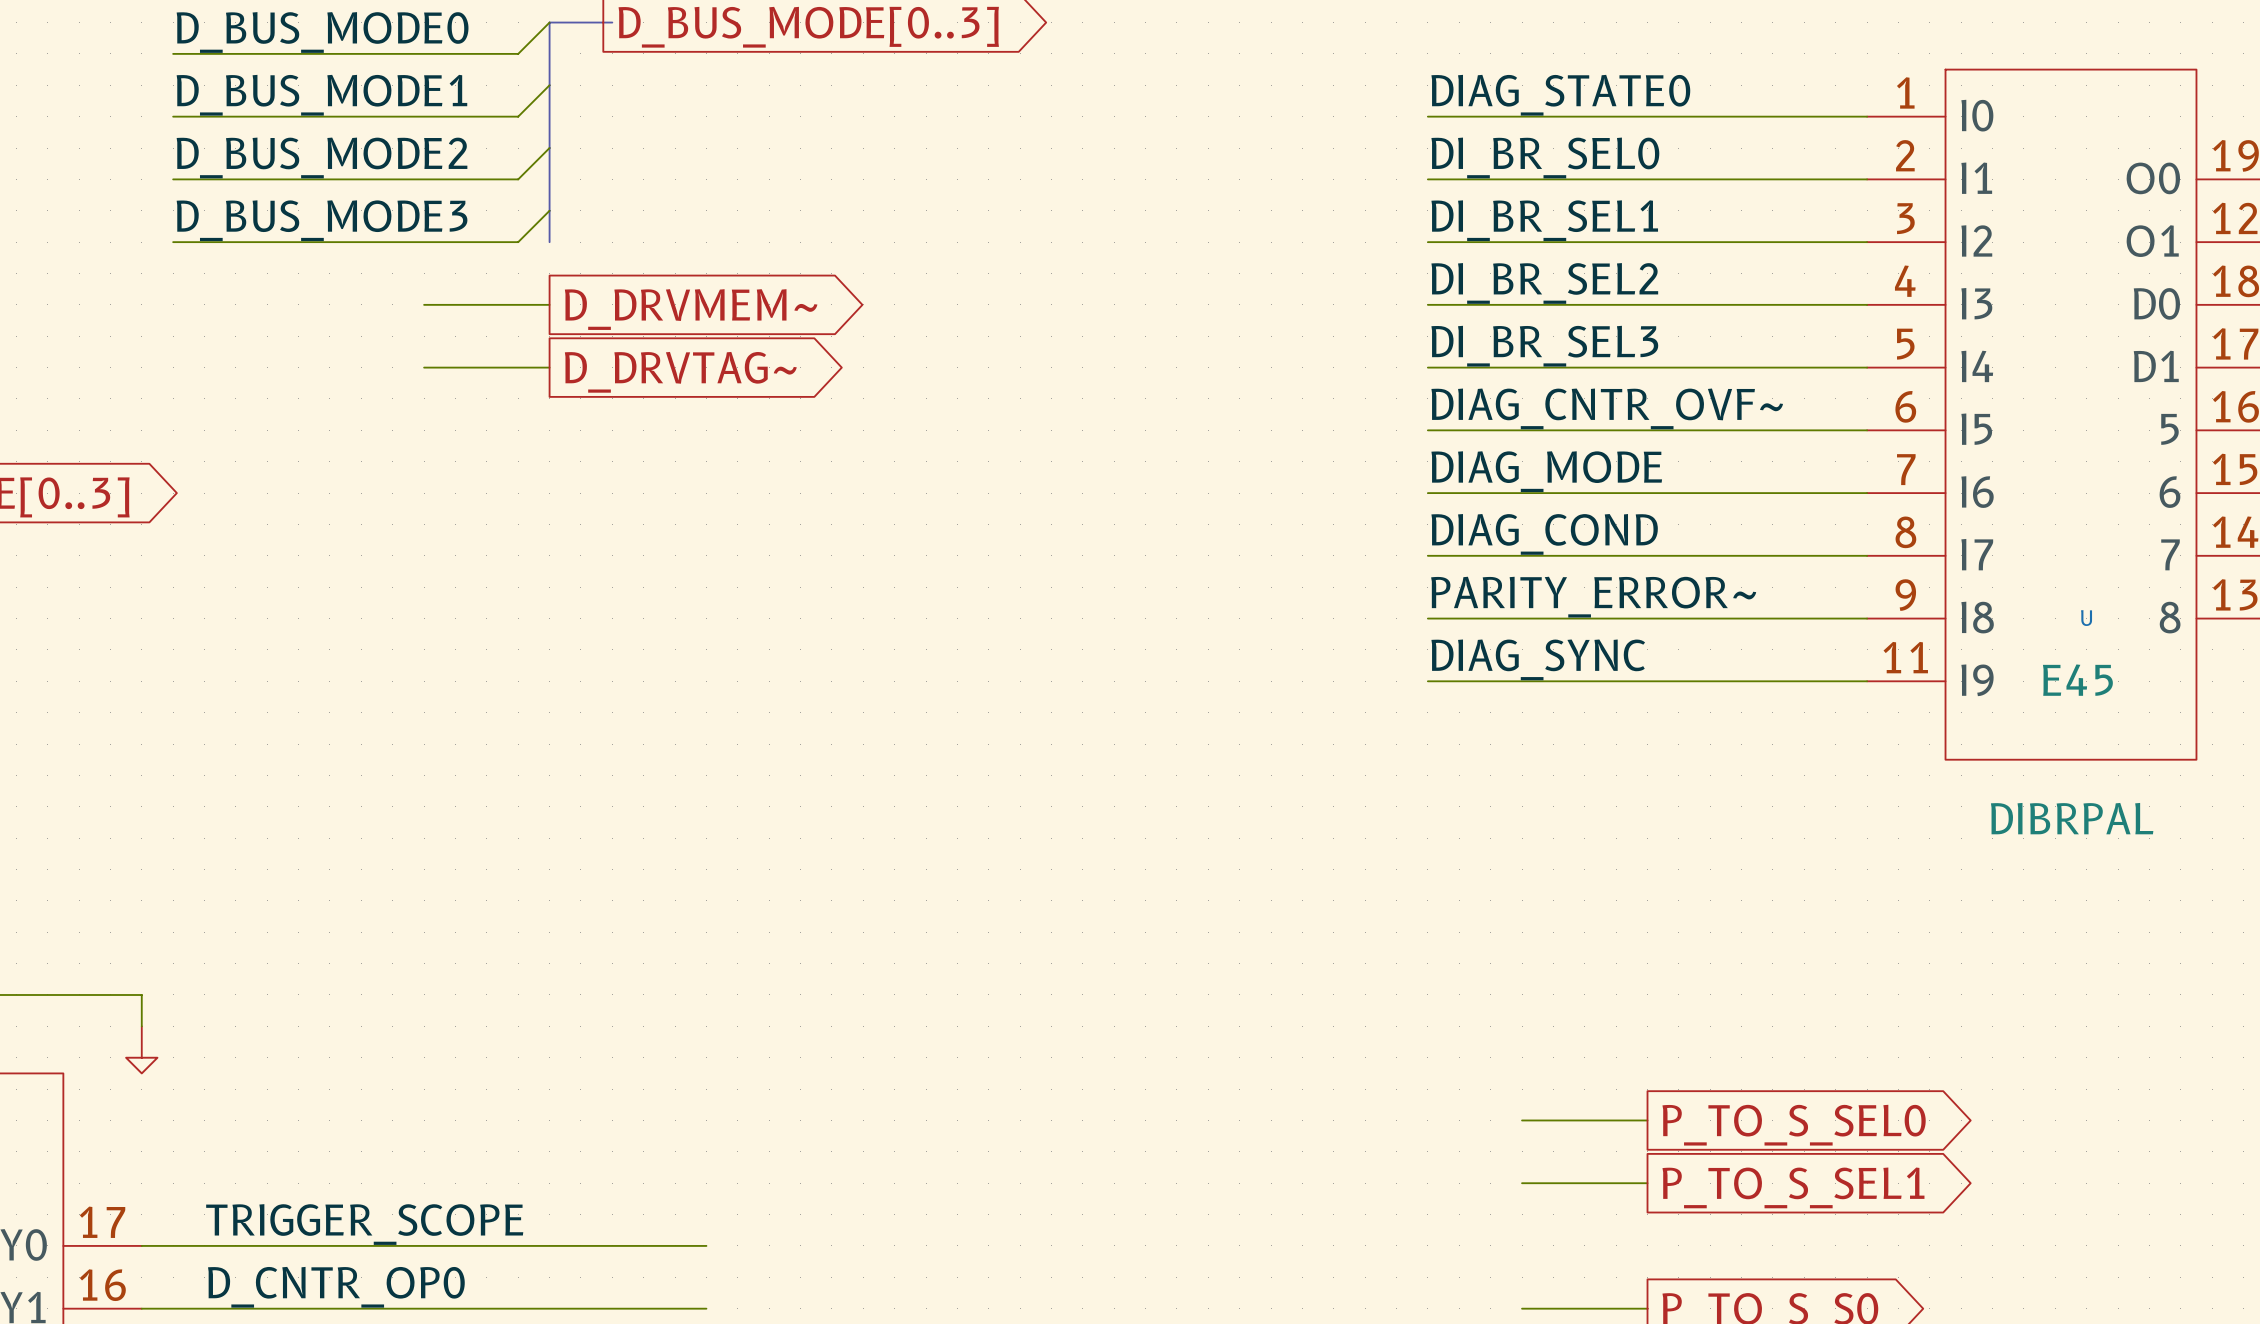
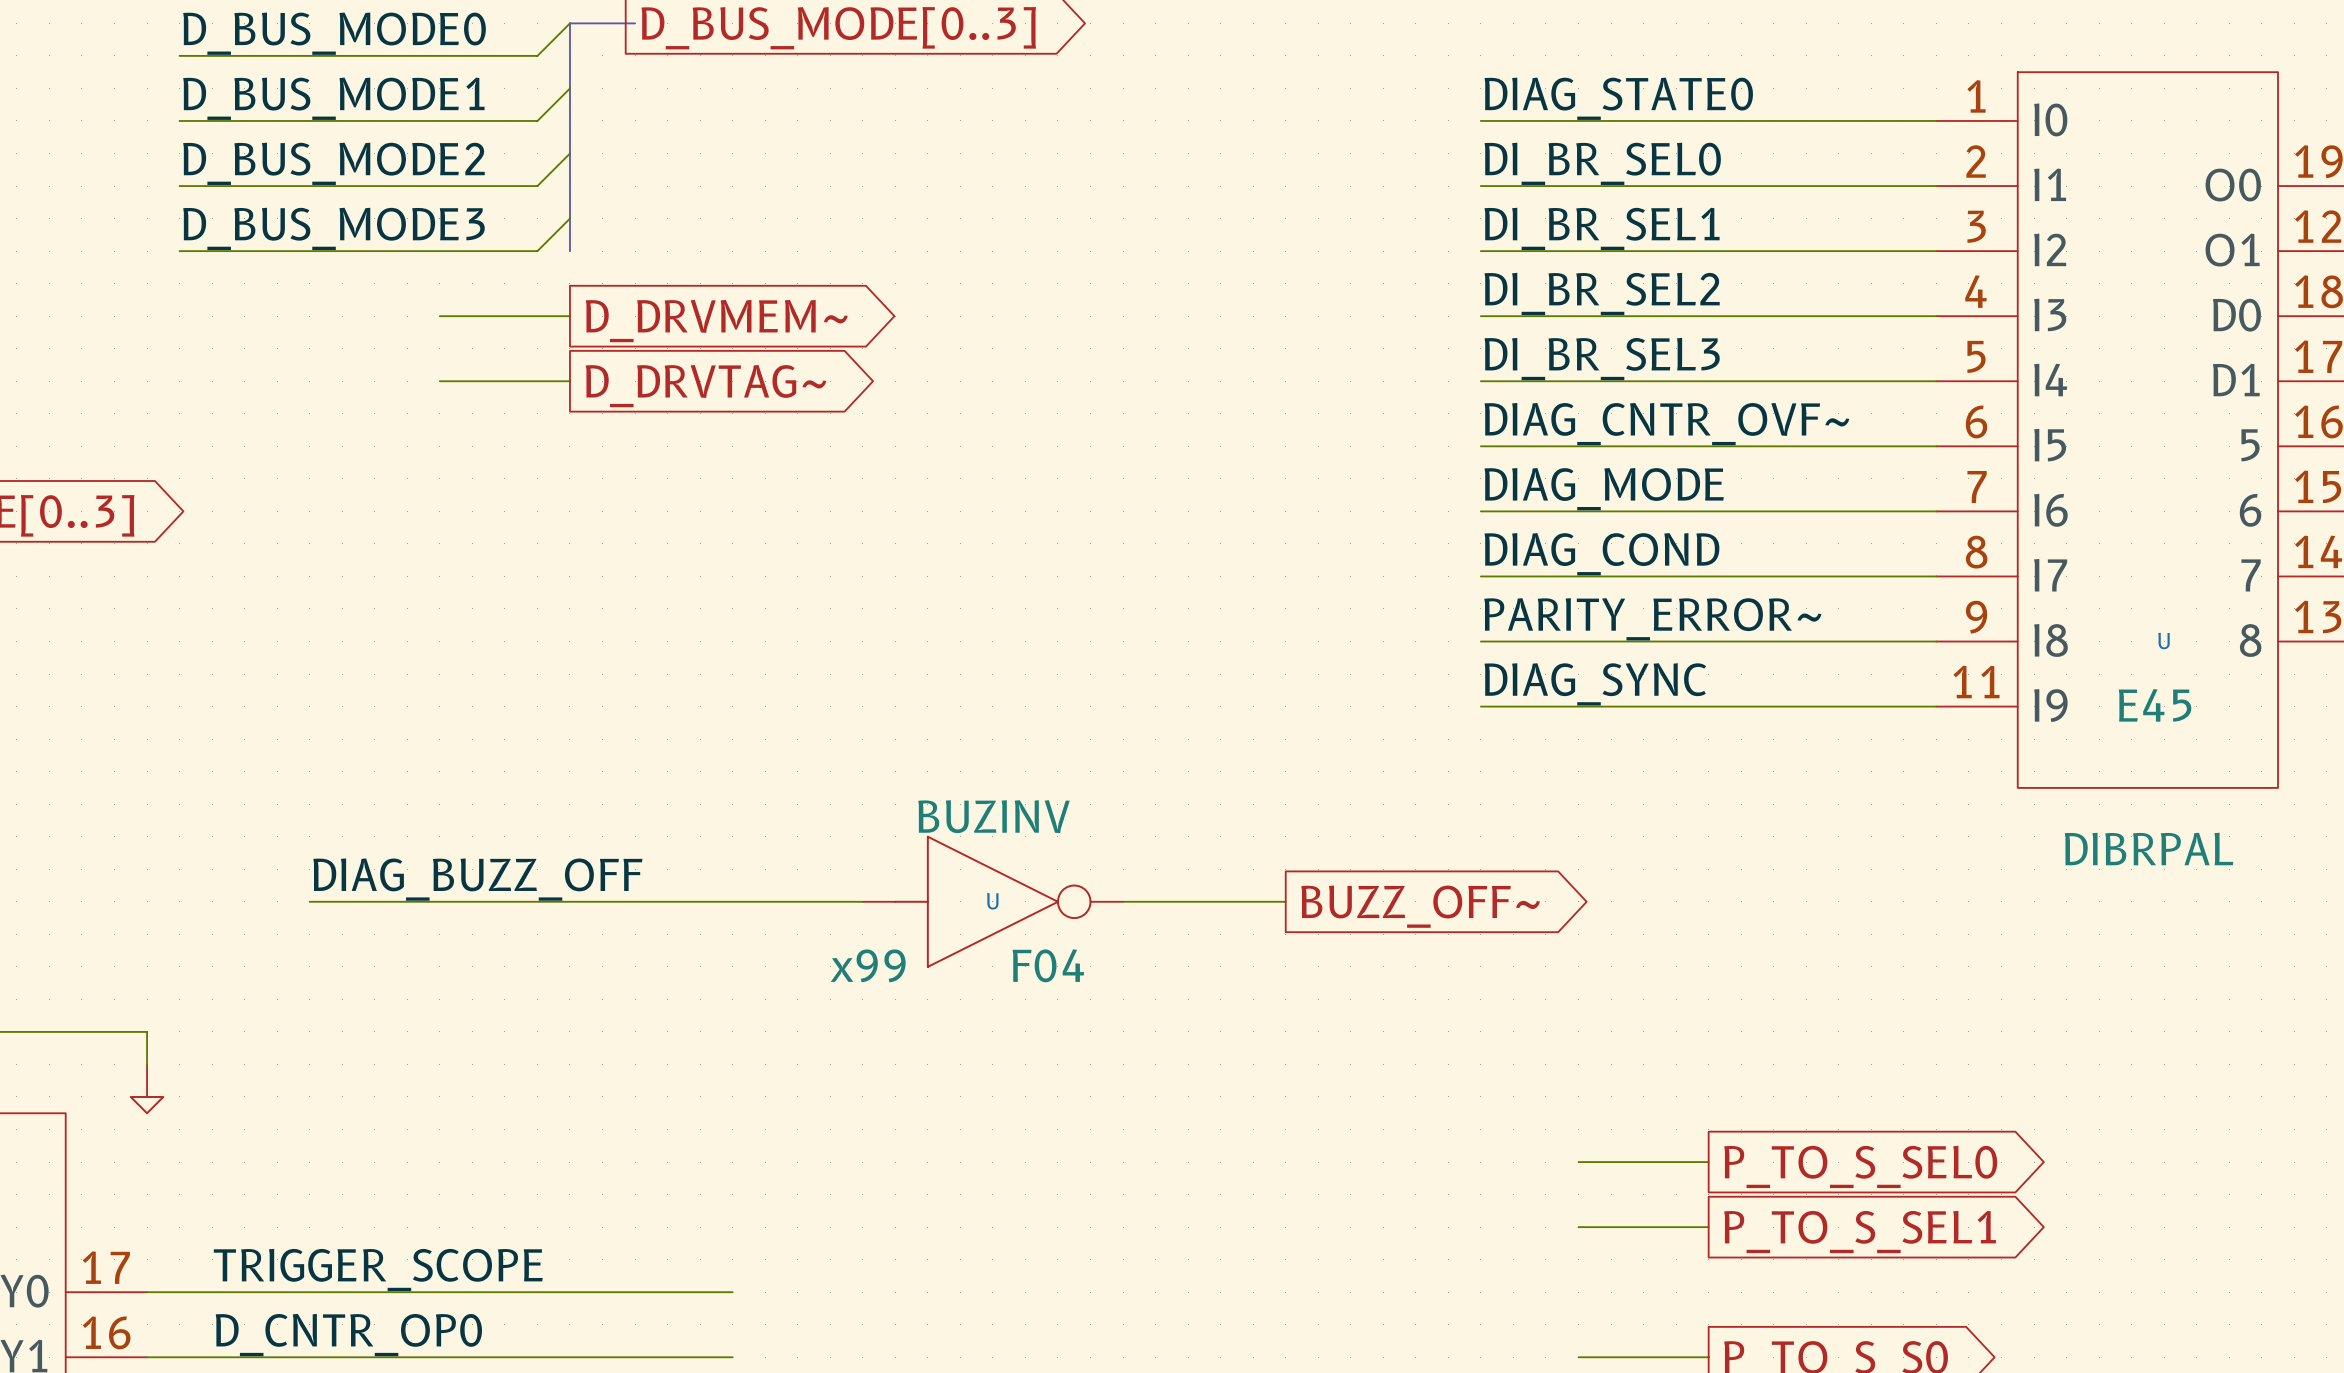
label: none -> DIAG_BUZZ_OFF (477, 879)
wire: none -> (309, 901) (862, 901)
U: none -> F04 (992, 901)
wire: none -> (1123, 901) (1285, 901)
global label: none -> BUZZ_OFF~ (1420, 906)

